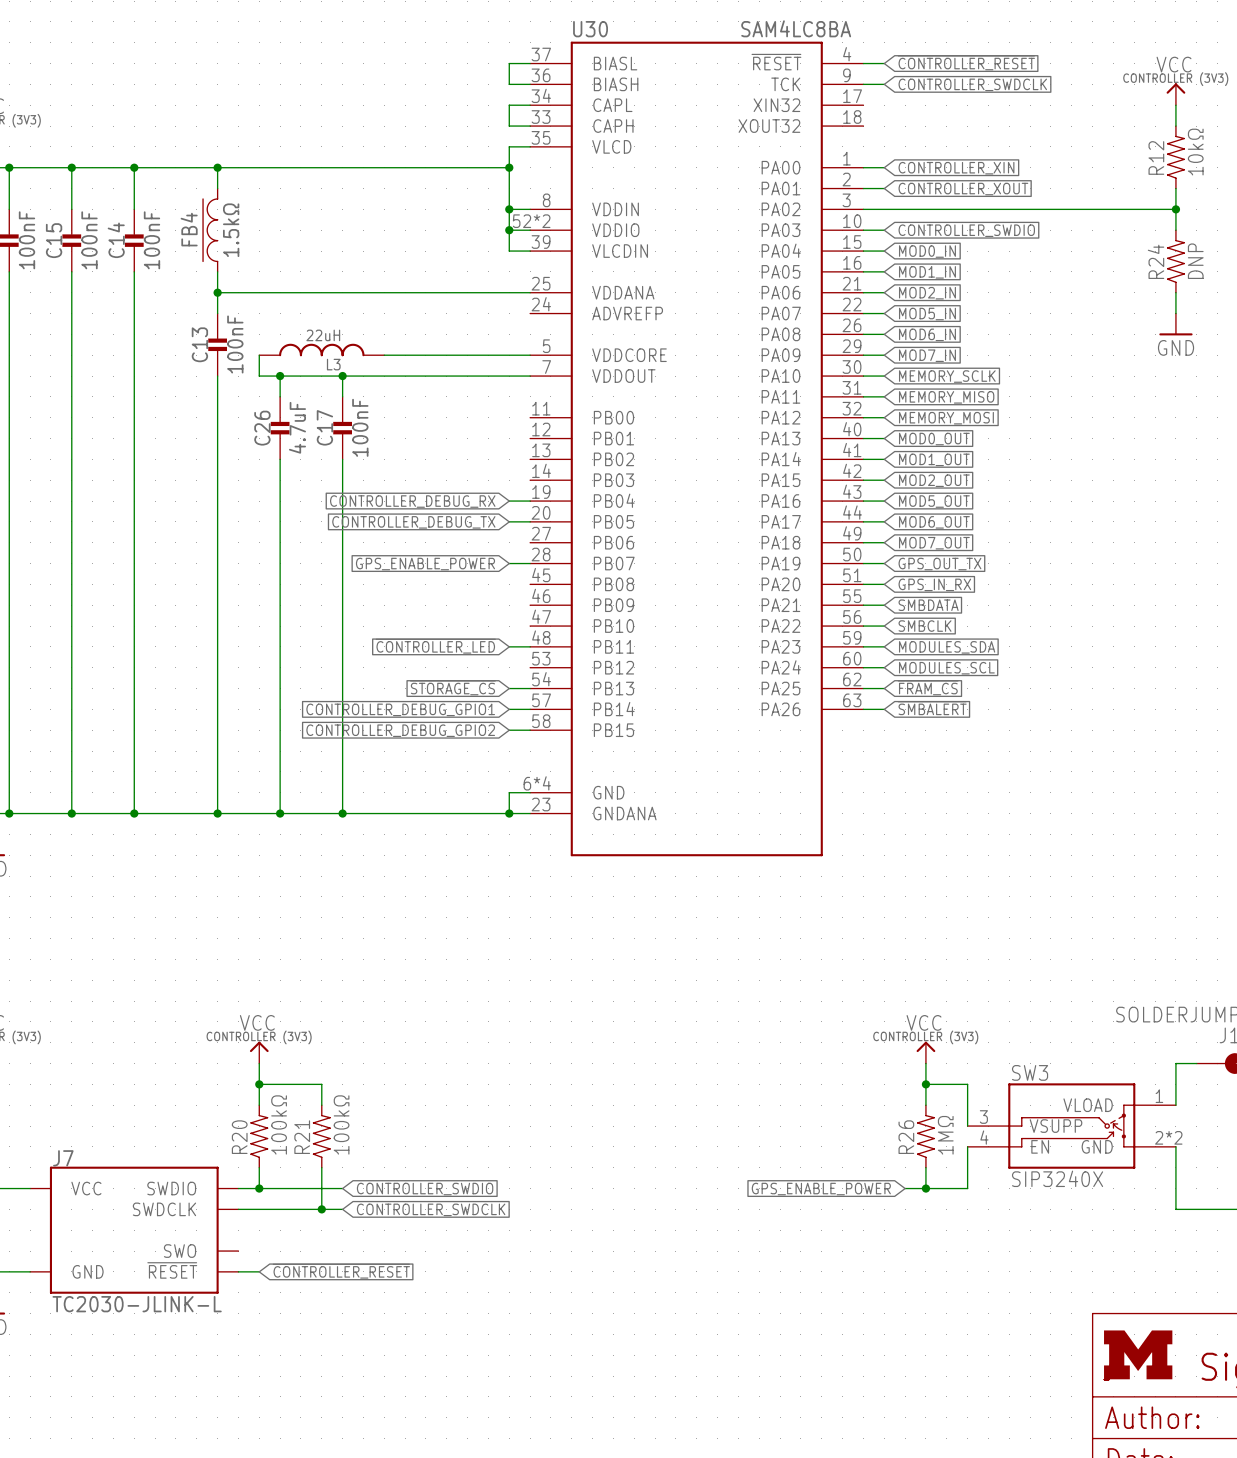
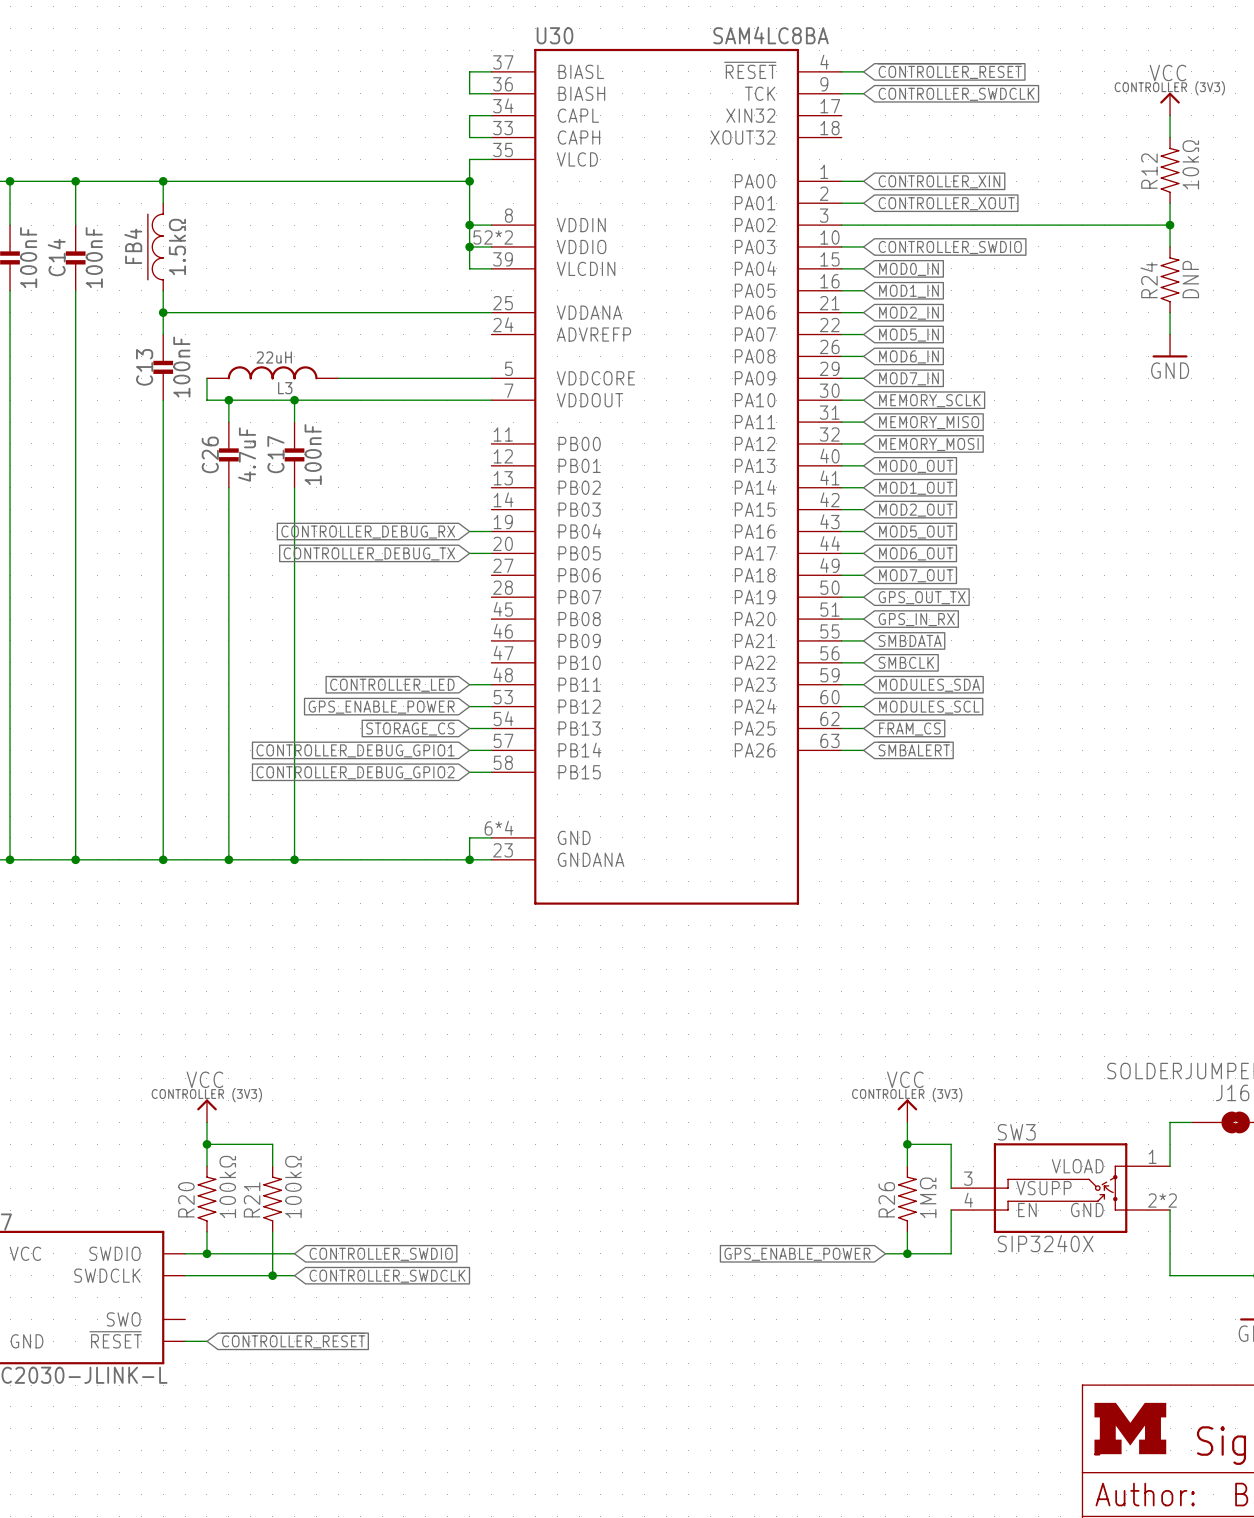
wire: (509, 563) (530, 563) -> (469, 706) (491, 706)
global label position: GPS_ENABLE_POWER (425, 564) -> GPS_ENABLE_POWER (381, 707)

